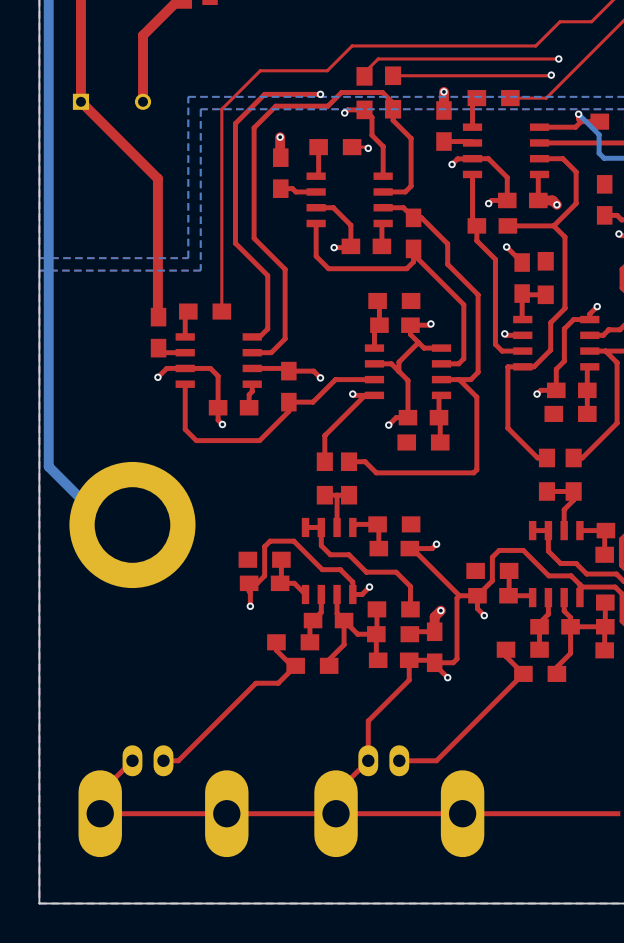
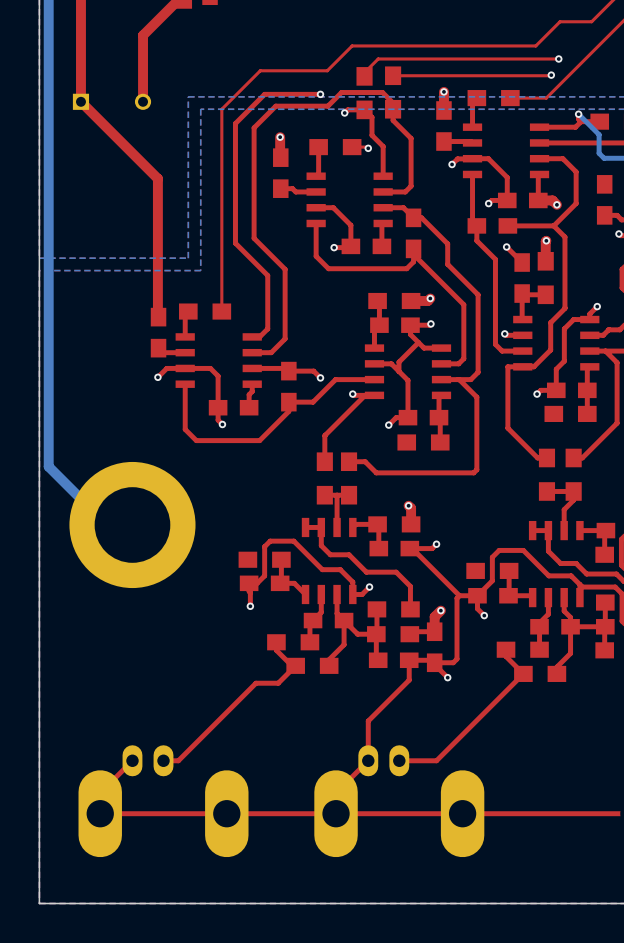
top track: none -> (546, 240) (545, 261)
via: none -> (546, 240)
top track: none -> (430, 298) (427, 300) (411, 300)
via: none -> (430, 298)
top track: none -> (408, 505) (411, 508) (411, 524)
via: none -> (408, 505)

